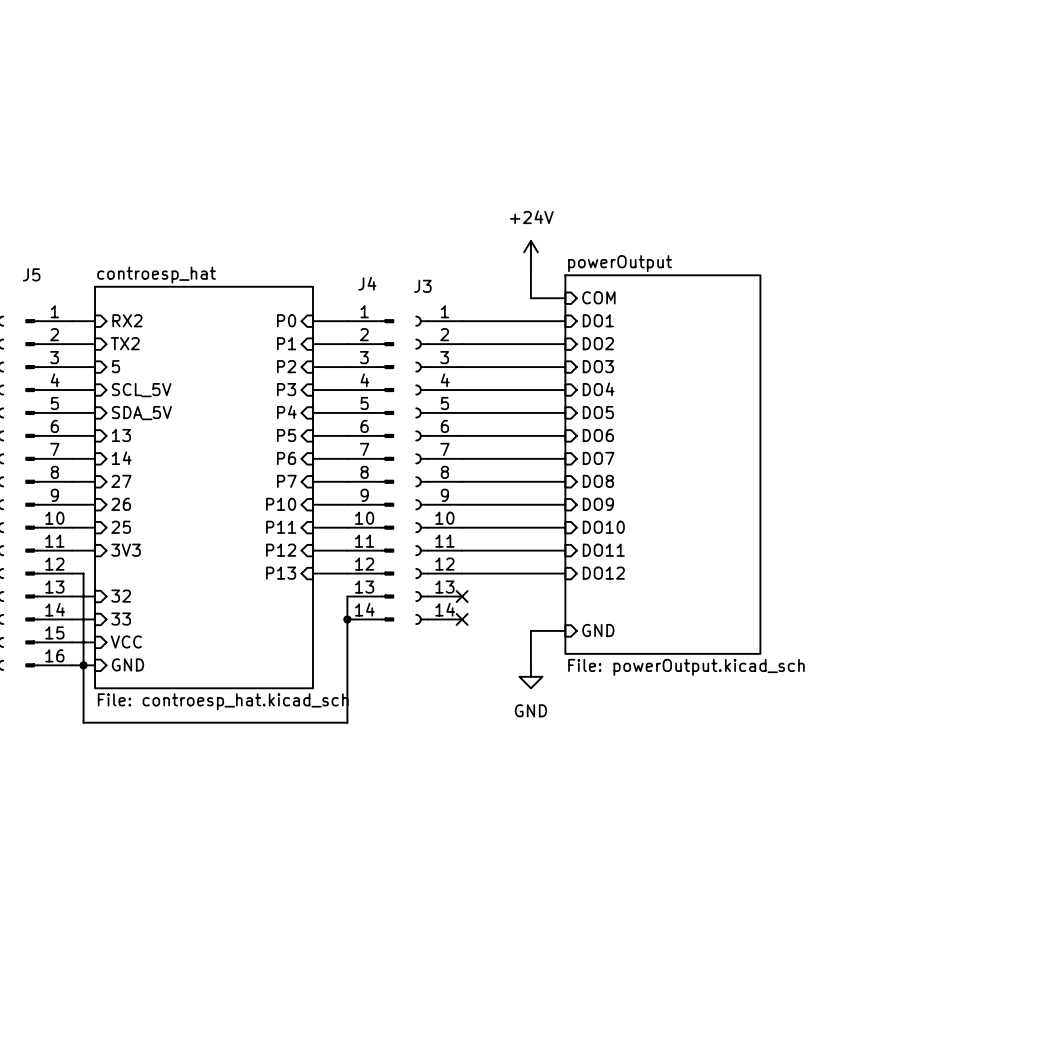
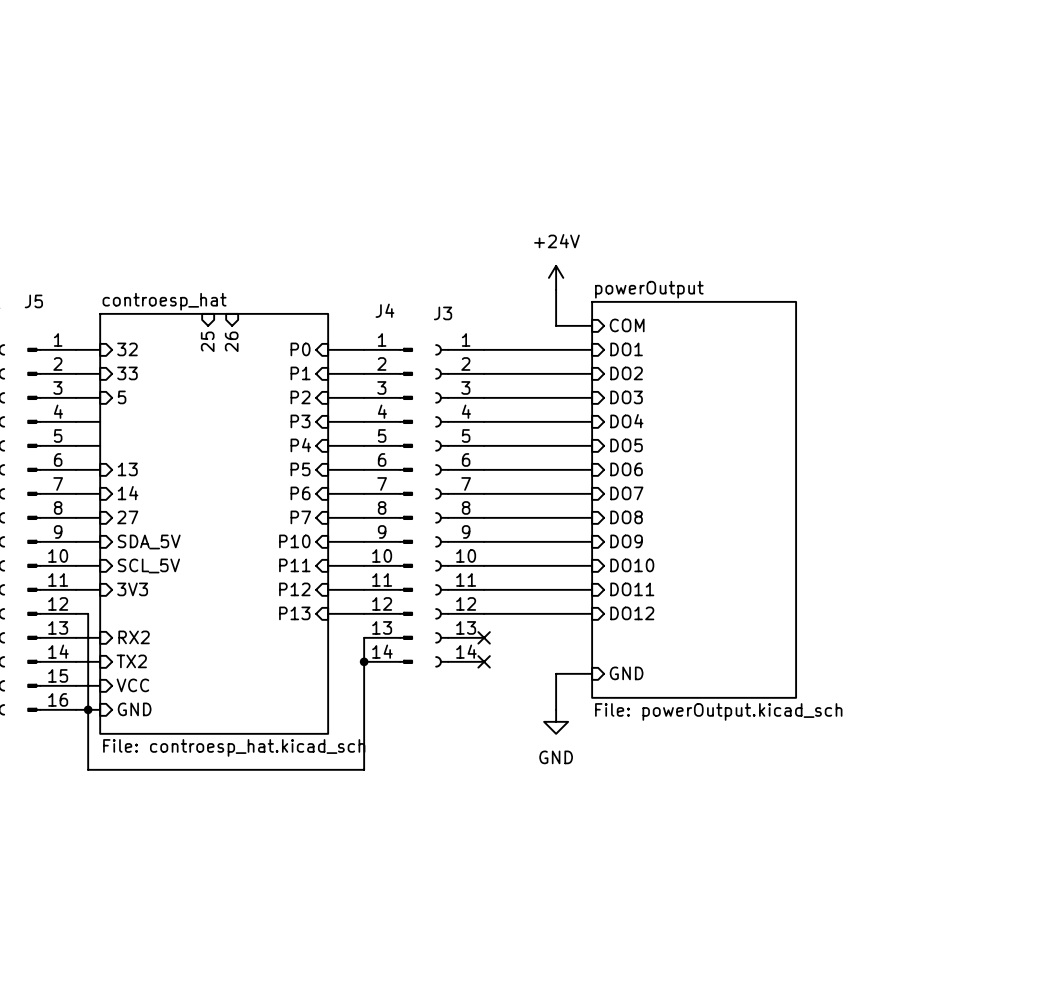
sheet pin: none -> 25 (207, 341)
sheet pin: none -> 26 (231, 341)
sheet pin: RX2 (127, 320) -> 32 (127, 349)
sheet pin: TX2 (125, 343) -> 33 (127, 373)
sheet pin: SCL_5V (141, 390) -> none
sheet pin: SDA_5V (141, 413) -> none
sheet pin: 26 (121, 504) -> SDA_5V (149, 541)
sheet pin: 25 (121, 527) -> SCL_5V (148, 565)
sheet pin: 32 (121, 596) -> RX2 (134, 637)
sheet pin: 33 (121, 619) -> TX2 (131, 661)

